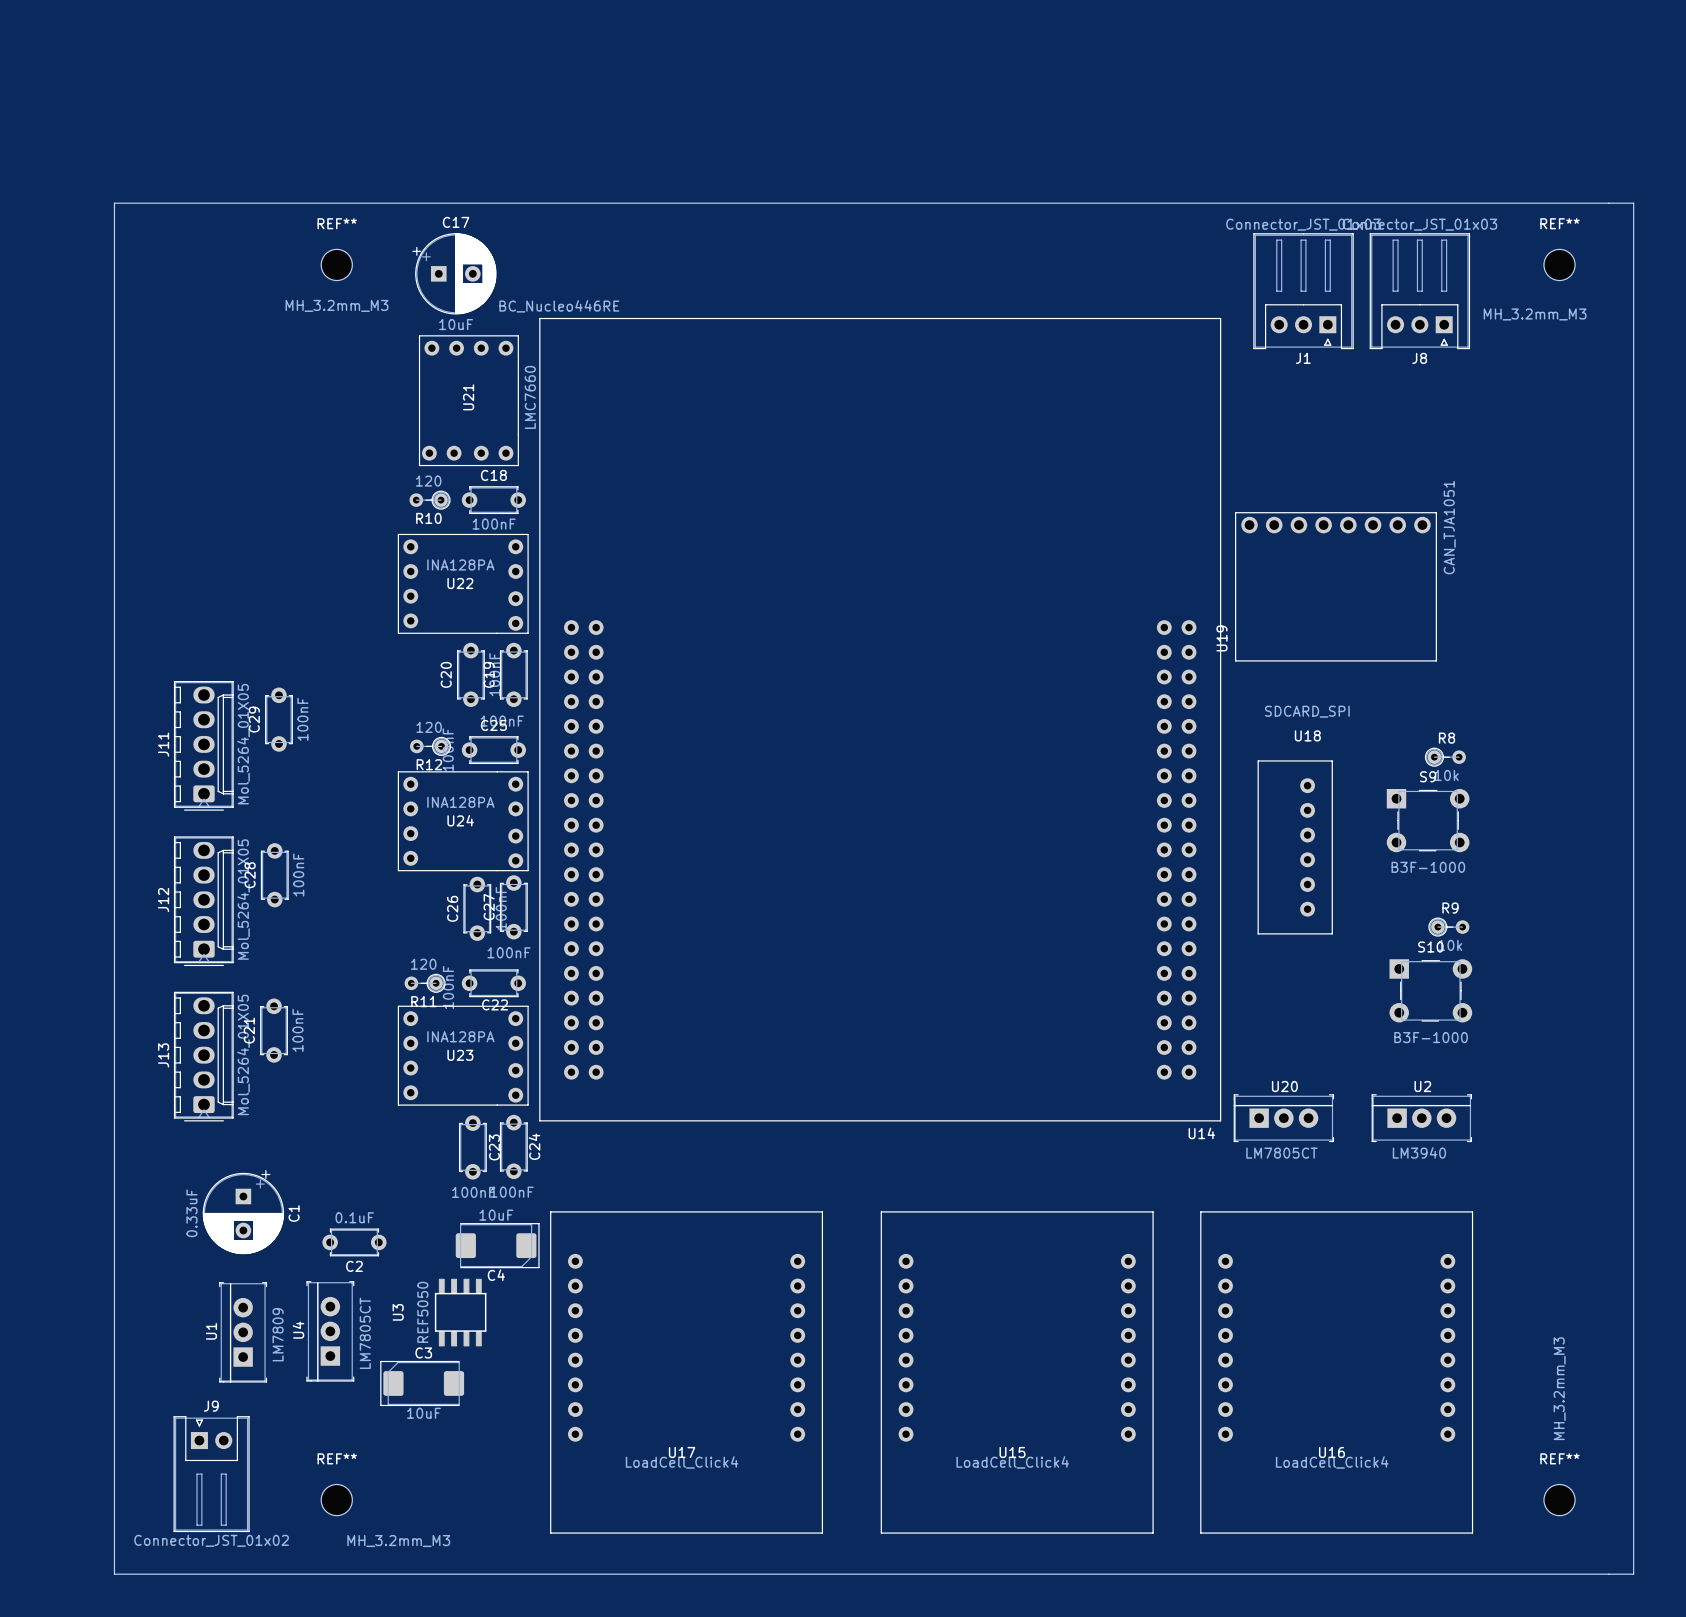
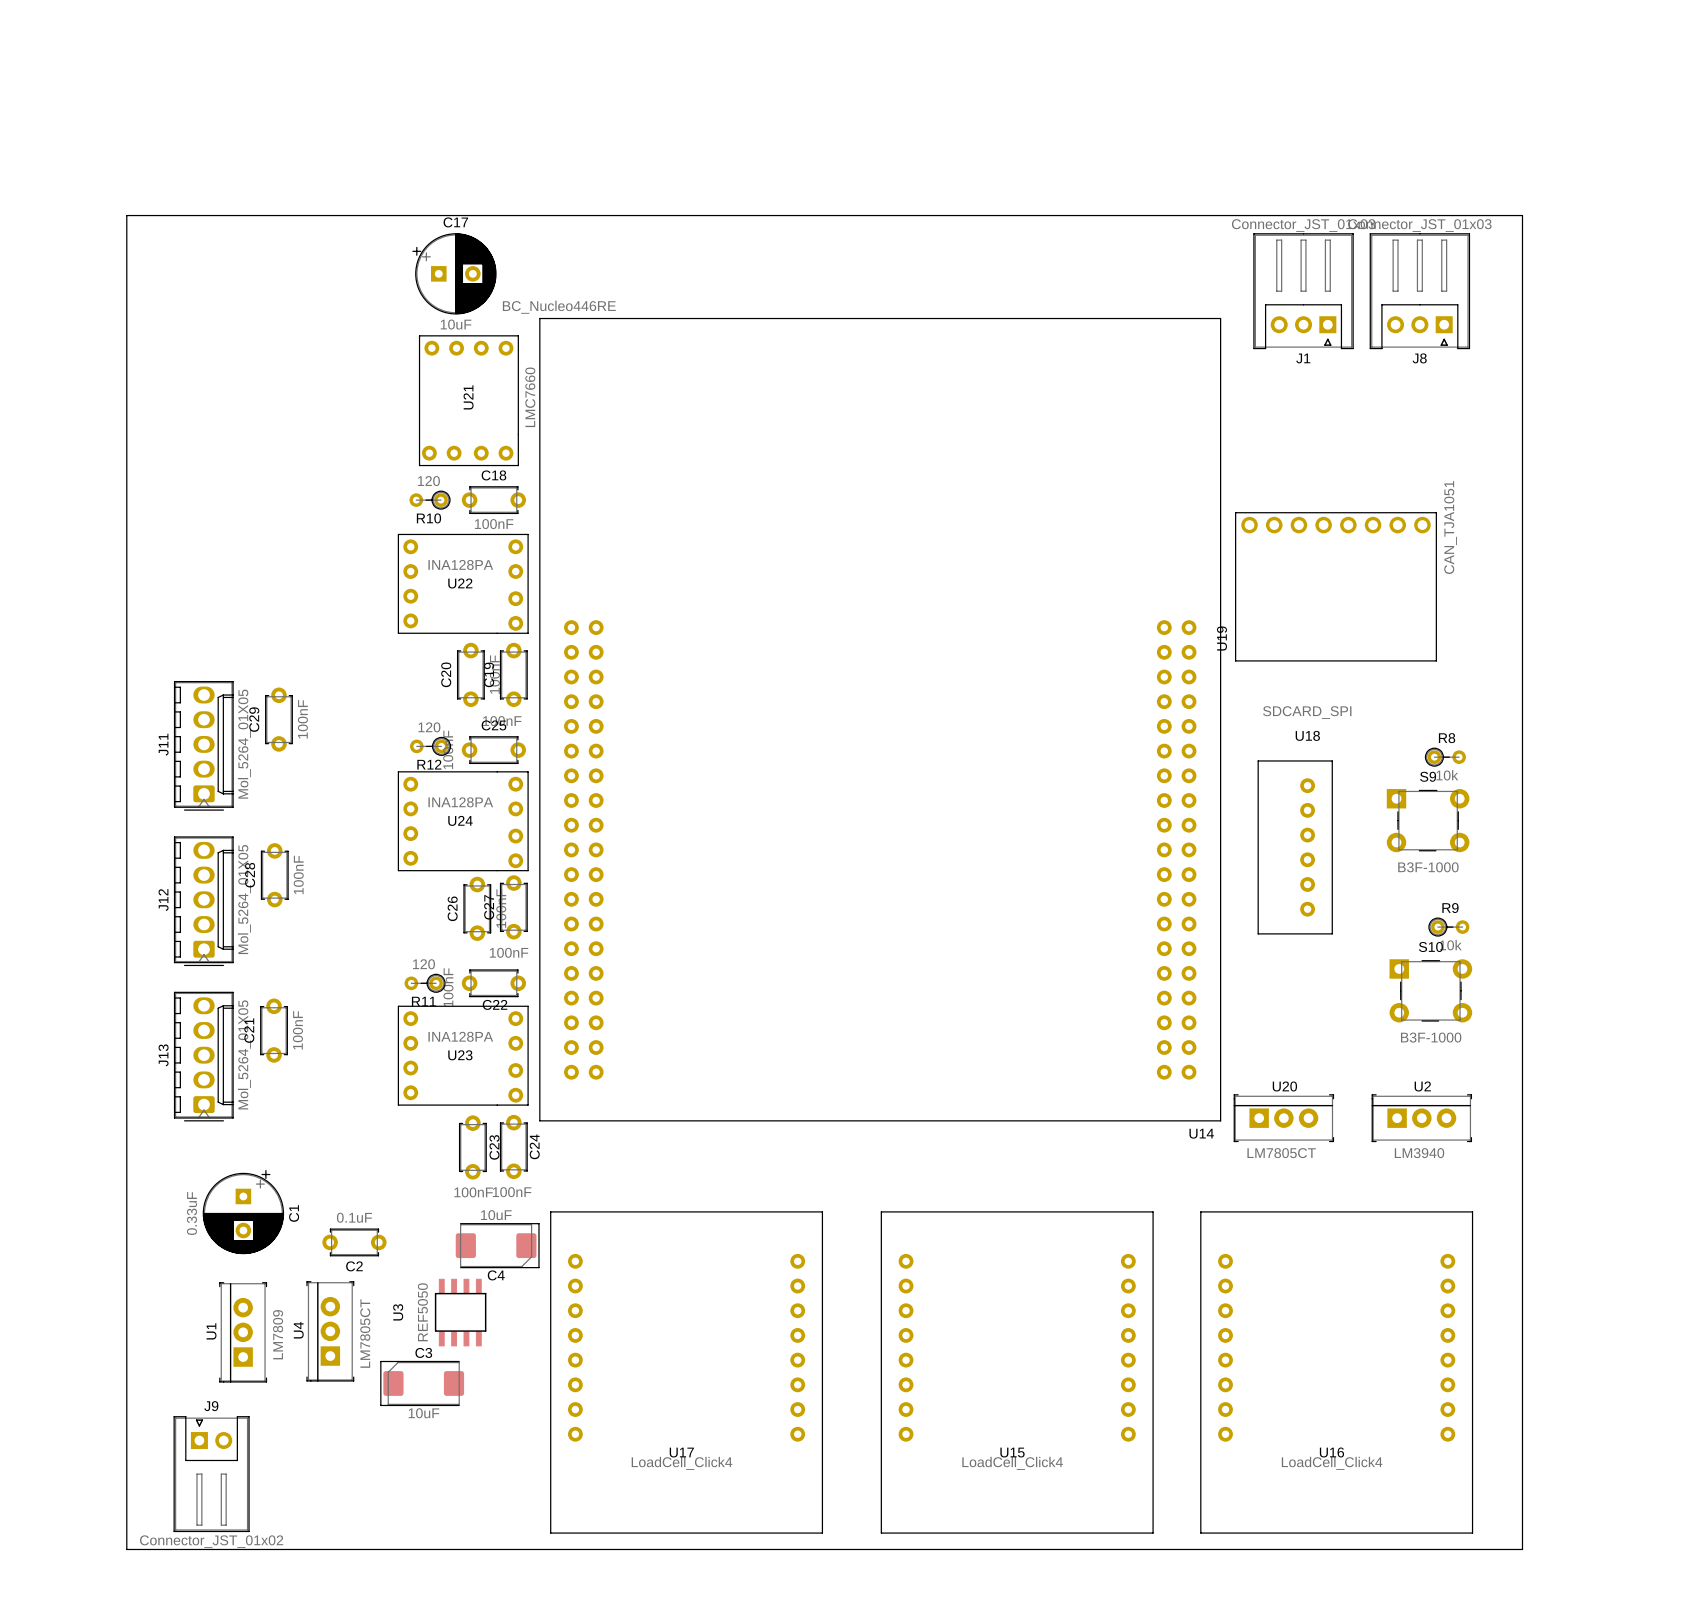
board edge: (114, 203) (1633, 203) (1633, 1574) (114, 1574) (114, 203) -> (126, 215) (126, 1549) (1522, 1549) (1522, 215) (126, 215)
REF**: MH_3.2mm_M3 (336, 264) -> none
REF**: MH_3.2mm_M3 (1559, 264) -> none
REF**: MH_3.2mm_M3 (336, 1500) -> none
REF**: MH_3.2mm_M3 (1559, 1500) -> none

